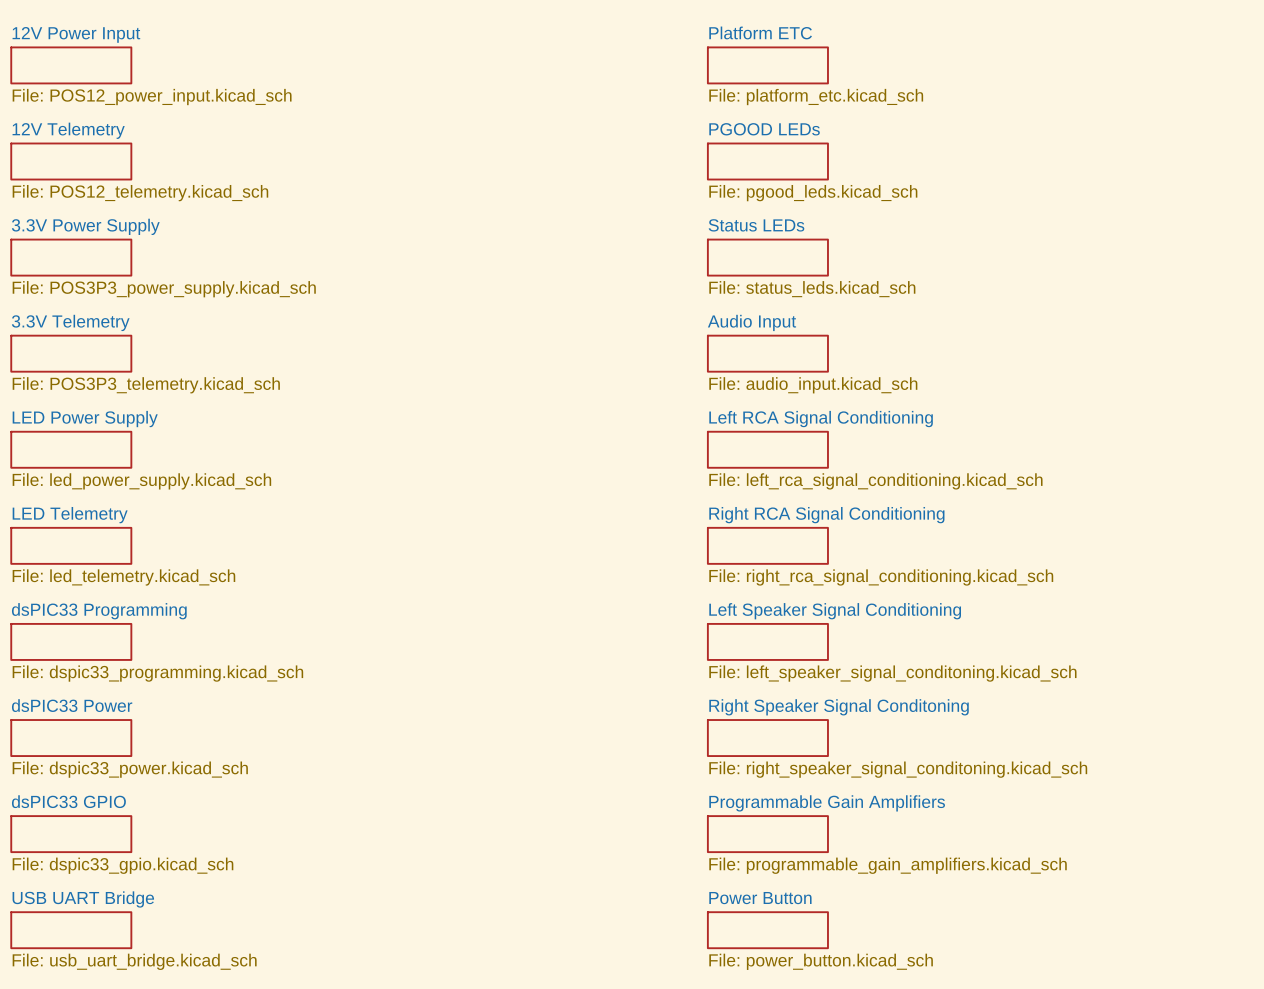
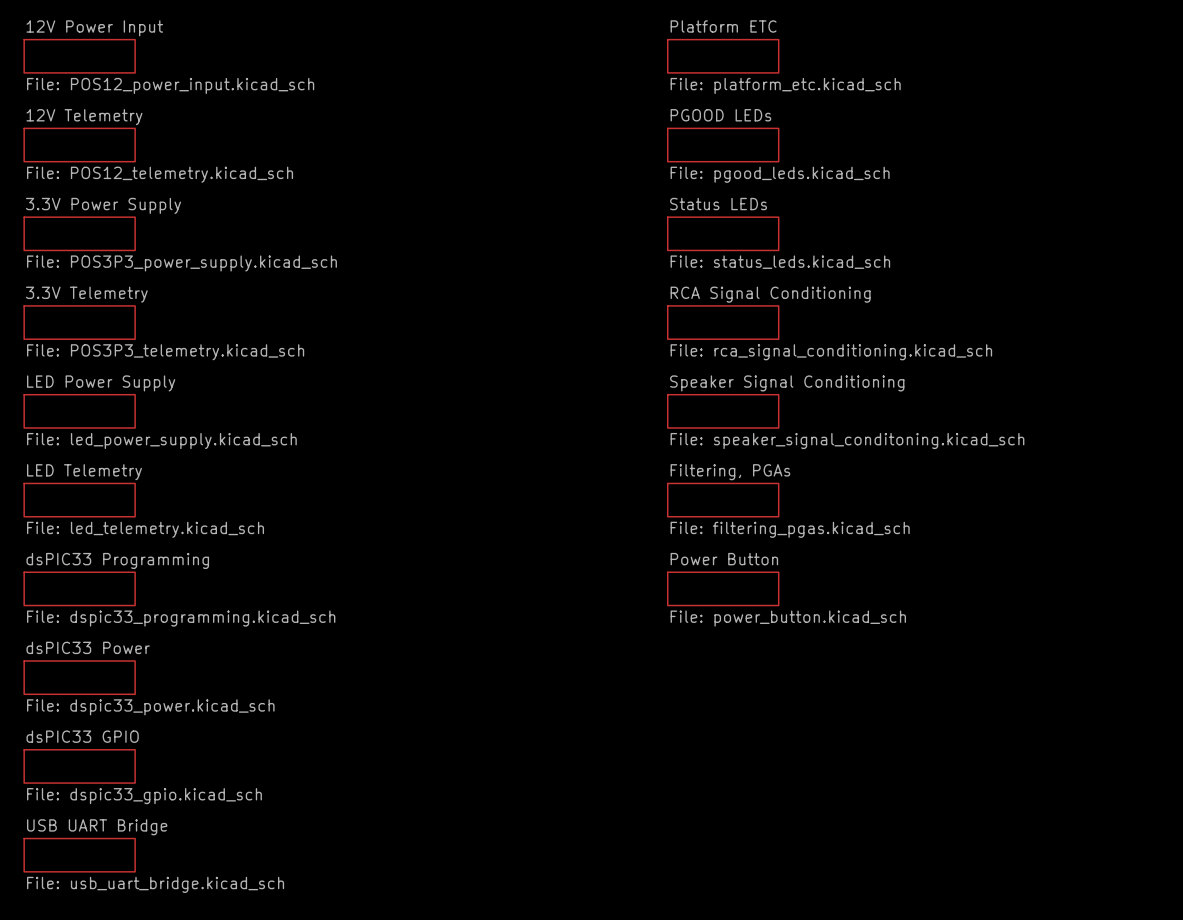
sheet Audio Input name: Audio Input (751, 322) -> RCA Signal Conditioning (770, 294)
sheet Audio Input value: File: audio_input.kicad_sch (813, 385) -> File: rca_signal_conditioning.kicad_sch (831, 352)
sheet Left RCA Signal Conditioning name: Left RCA Signal Conditioning (821, 419) -> Speaker Signal Conditioning (787, 383)
sheet Left RCA Signal Conditioning value: File: left_rca_signal_conditioning.kicad_sch (875, 481) -> File: speaker_signal_conditoning.kicad_sch (847, 441)
sheet Right RCA Signal Conditioning name: Right RCA Signal Conditioning (826, 515) -> Filtering, PGAs (730, 472)
sheet Right RCA Signal Conditioning value: File: right_rca_signal_conditioning.kicad_sch (881, 577) -> File: filtering_pgas.kicad_sch (790, 529)
sheet Left Speaker Signal Conditioning name: Left Speaker Signal Conditioning (835, 611) -> Power Button (724, 559)
sheet Left Speaker Signal Conditioning value: File: left_speaker_signal_conditoning.kicad_sch (892, 673) -> File: power_button.kicad_sch (788, 618)
sheet Right Speaker Signal Conditoning: File: right_speaker_signal_conditoning.kicad_sch (767, 738) -> none
sheet Programmable Gain Amplifiers: File: programmable_gain_amplifiers.kicad_sch (767, 834) -> none
sheet Power Button: File: power_button.kicad_sch (767, 930) -> none

